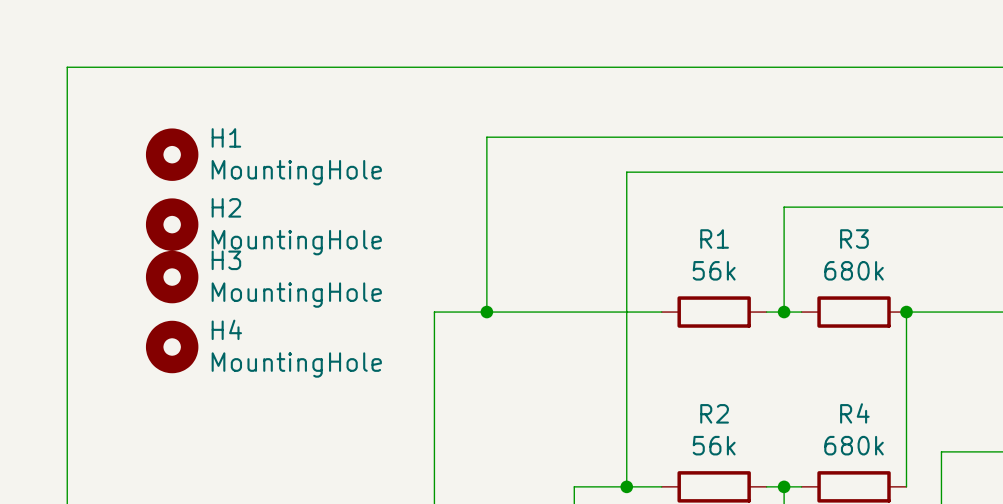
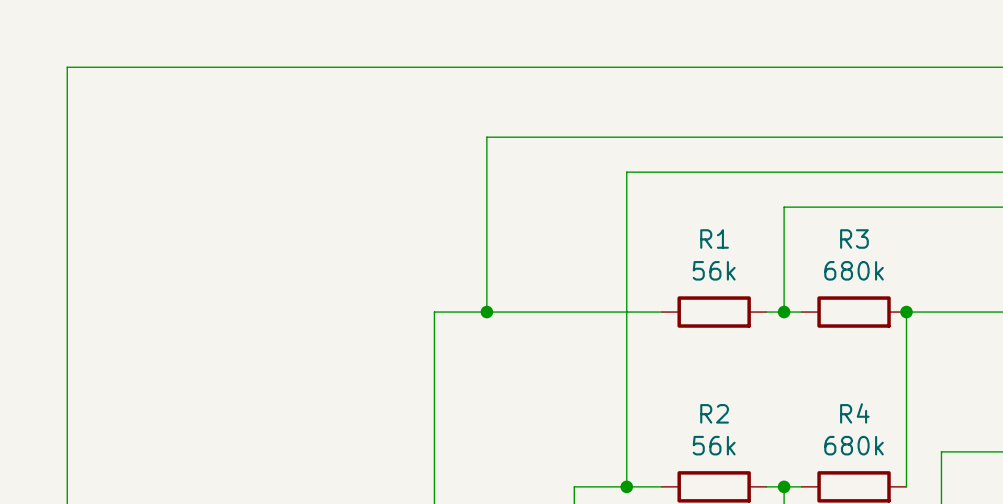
H1: MountingHole (172, 154) -> none
H2: MountingHole (172, 224) -> none
H3: MountingHole (172, 277) -> none
H4: MountingHole (172, 347) -> none

